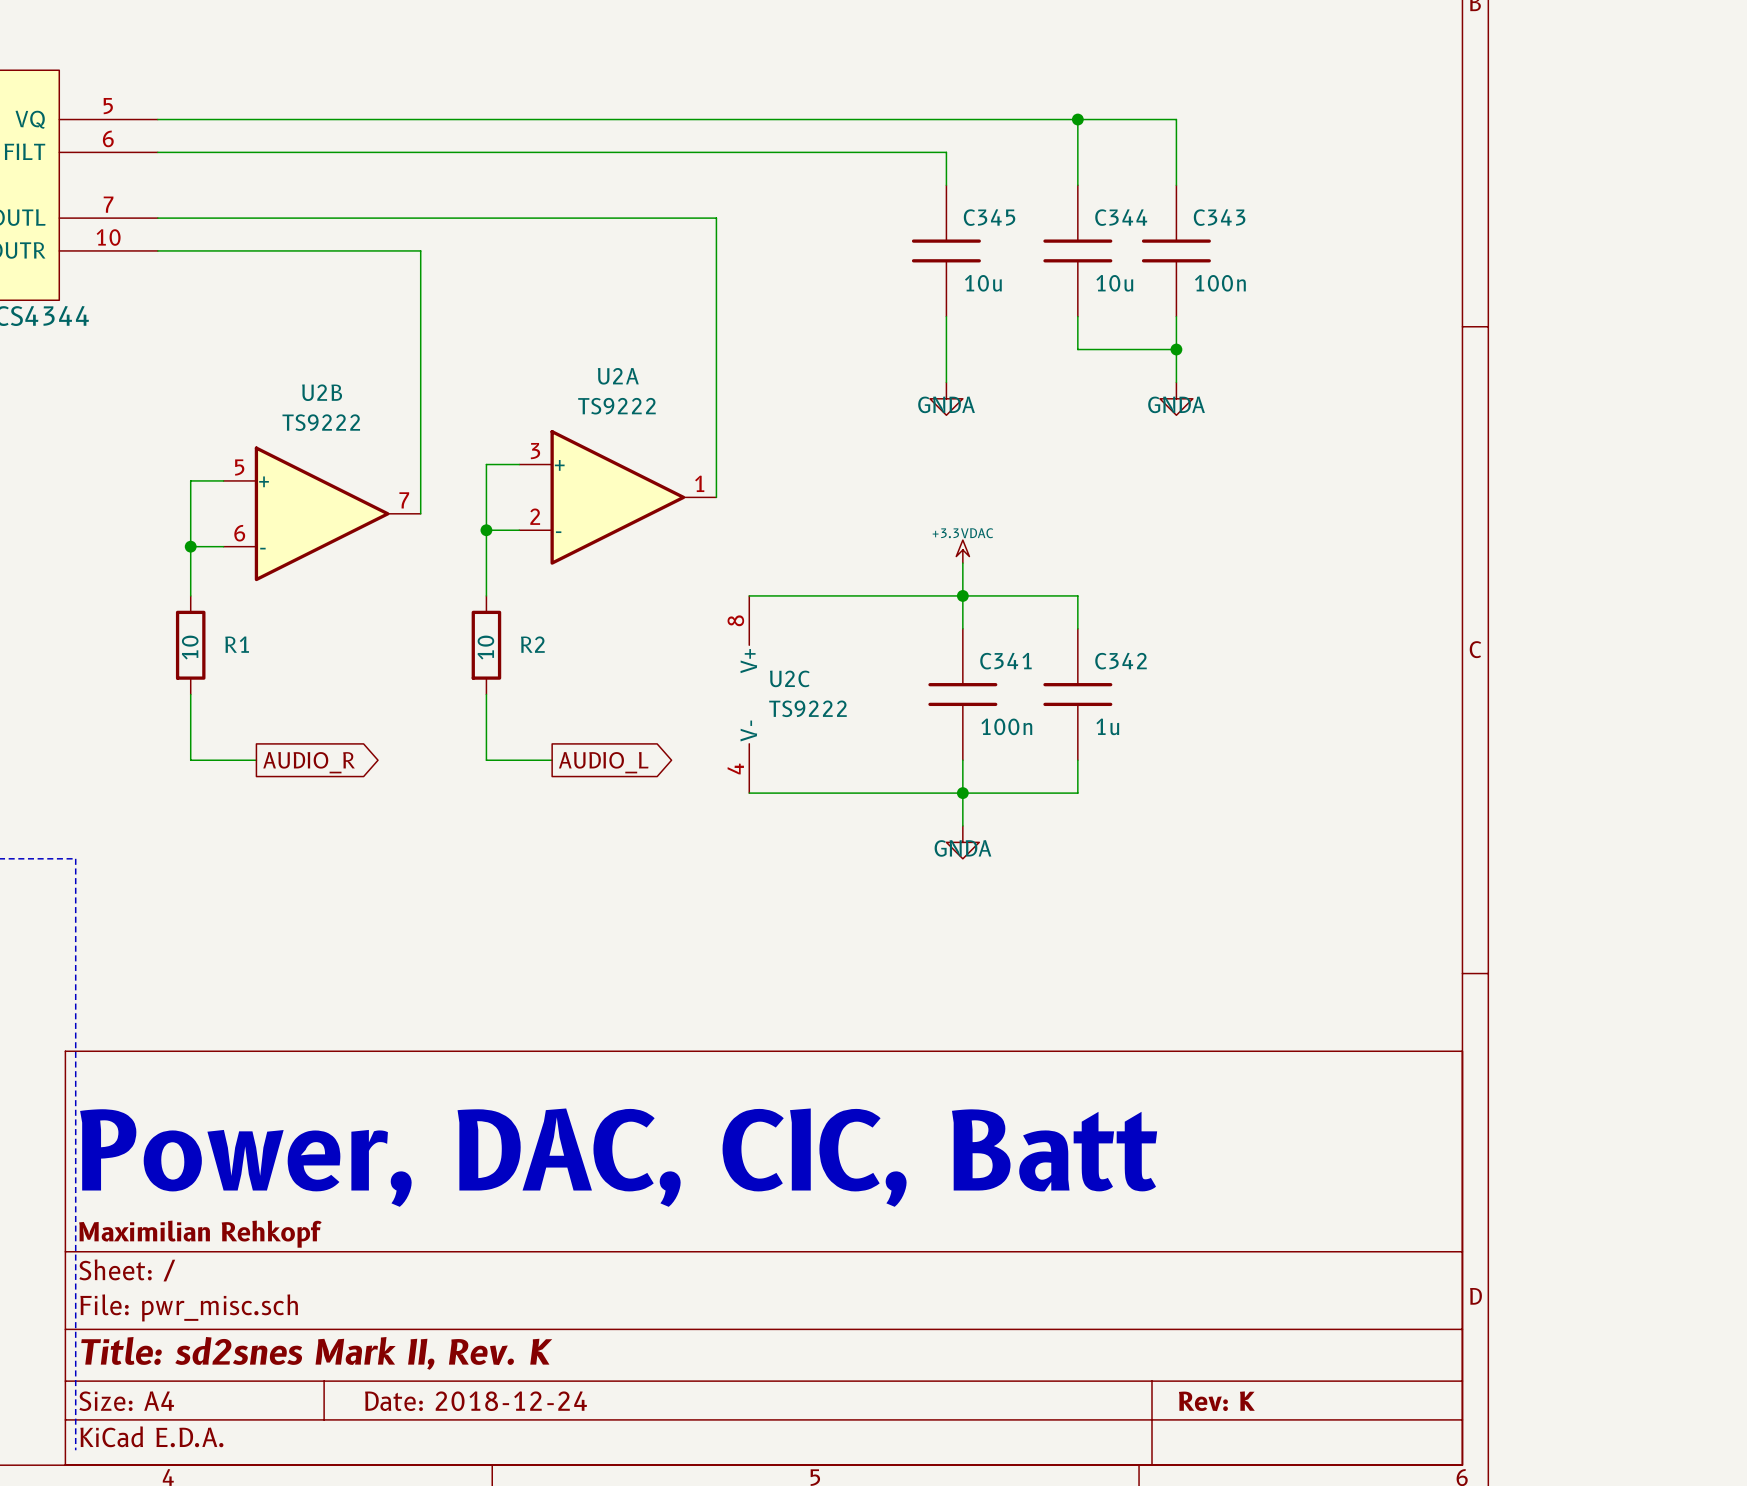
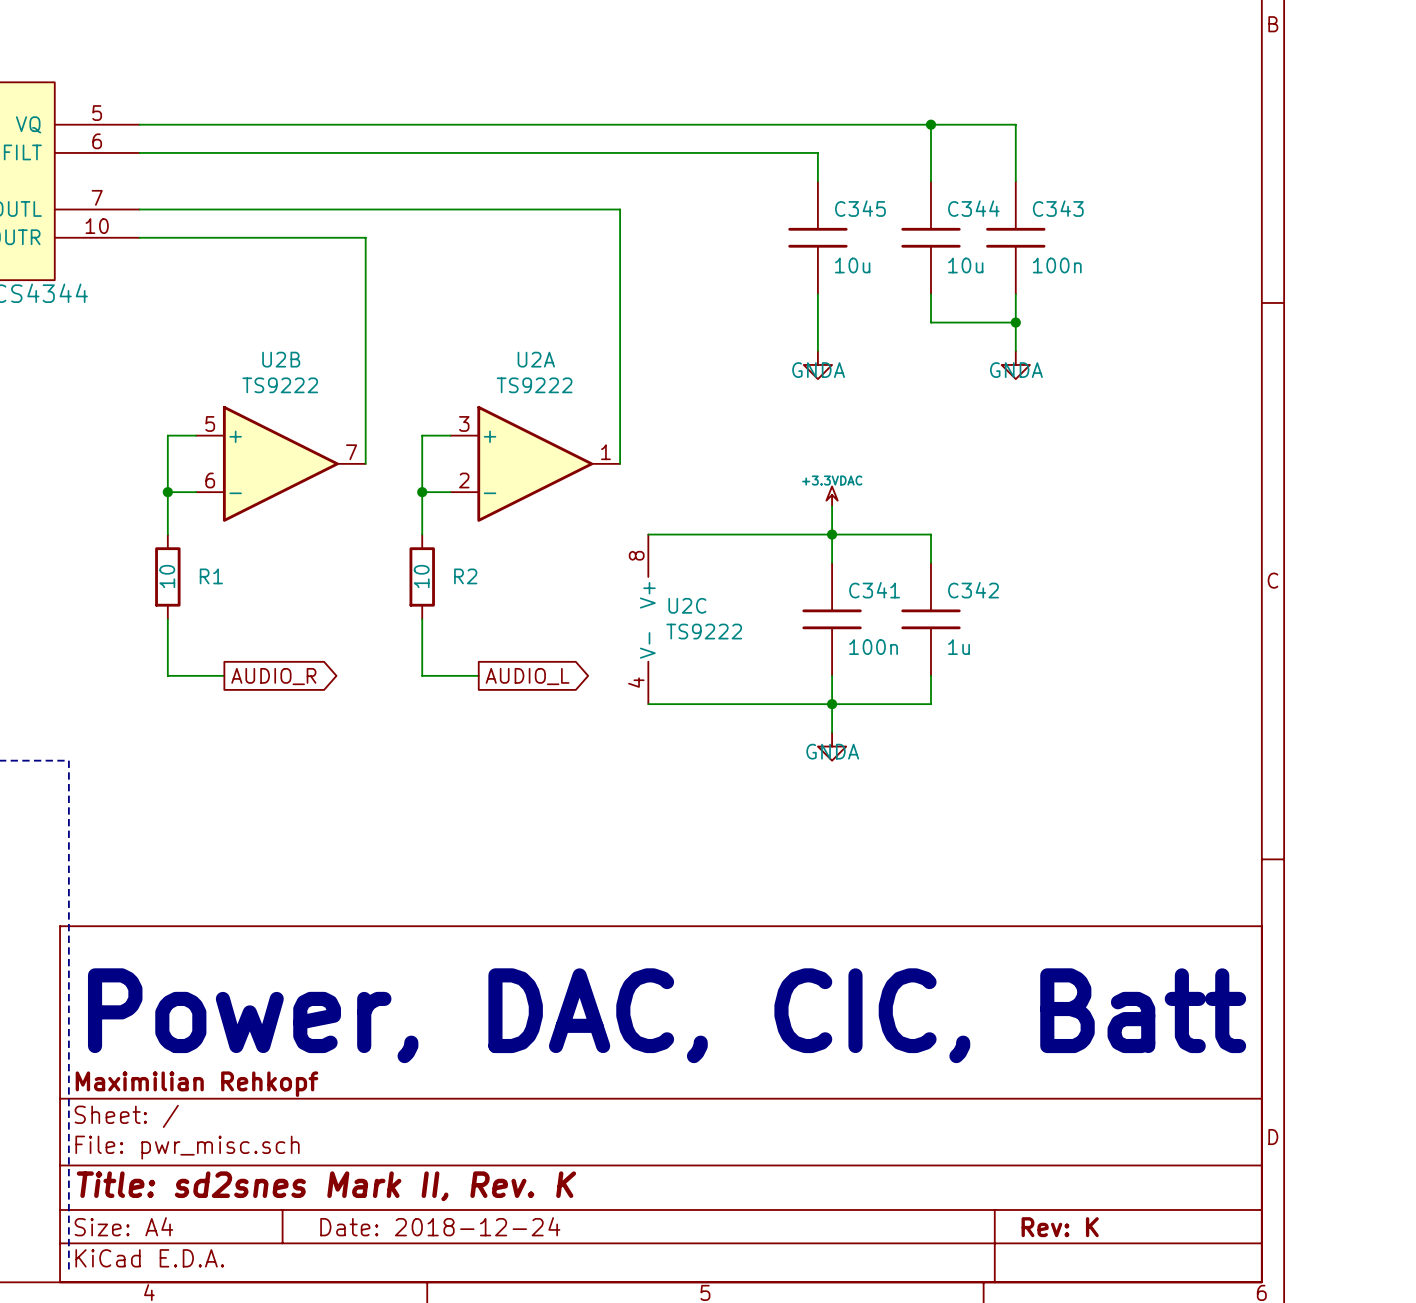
wire: (519, 464) (486, 464) (486, 480) -> (450, 435) (422, 435)
U2A position: (617, 497) -> (535, 463)
wire: none -> (620, 449) (620, 463)
wire: (486, 530) (519, 530) -> (422, 492) (450, 492)
junction position: (486, 530) -> (422, 492)

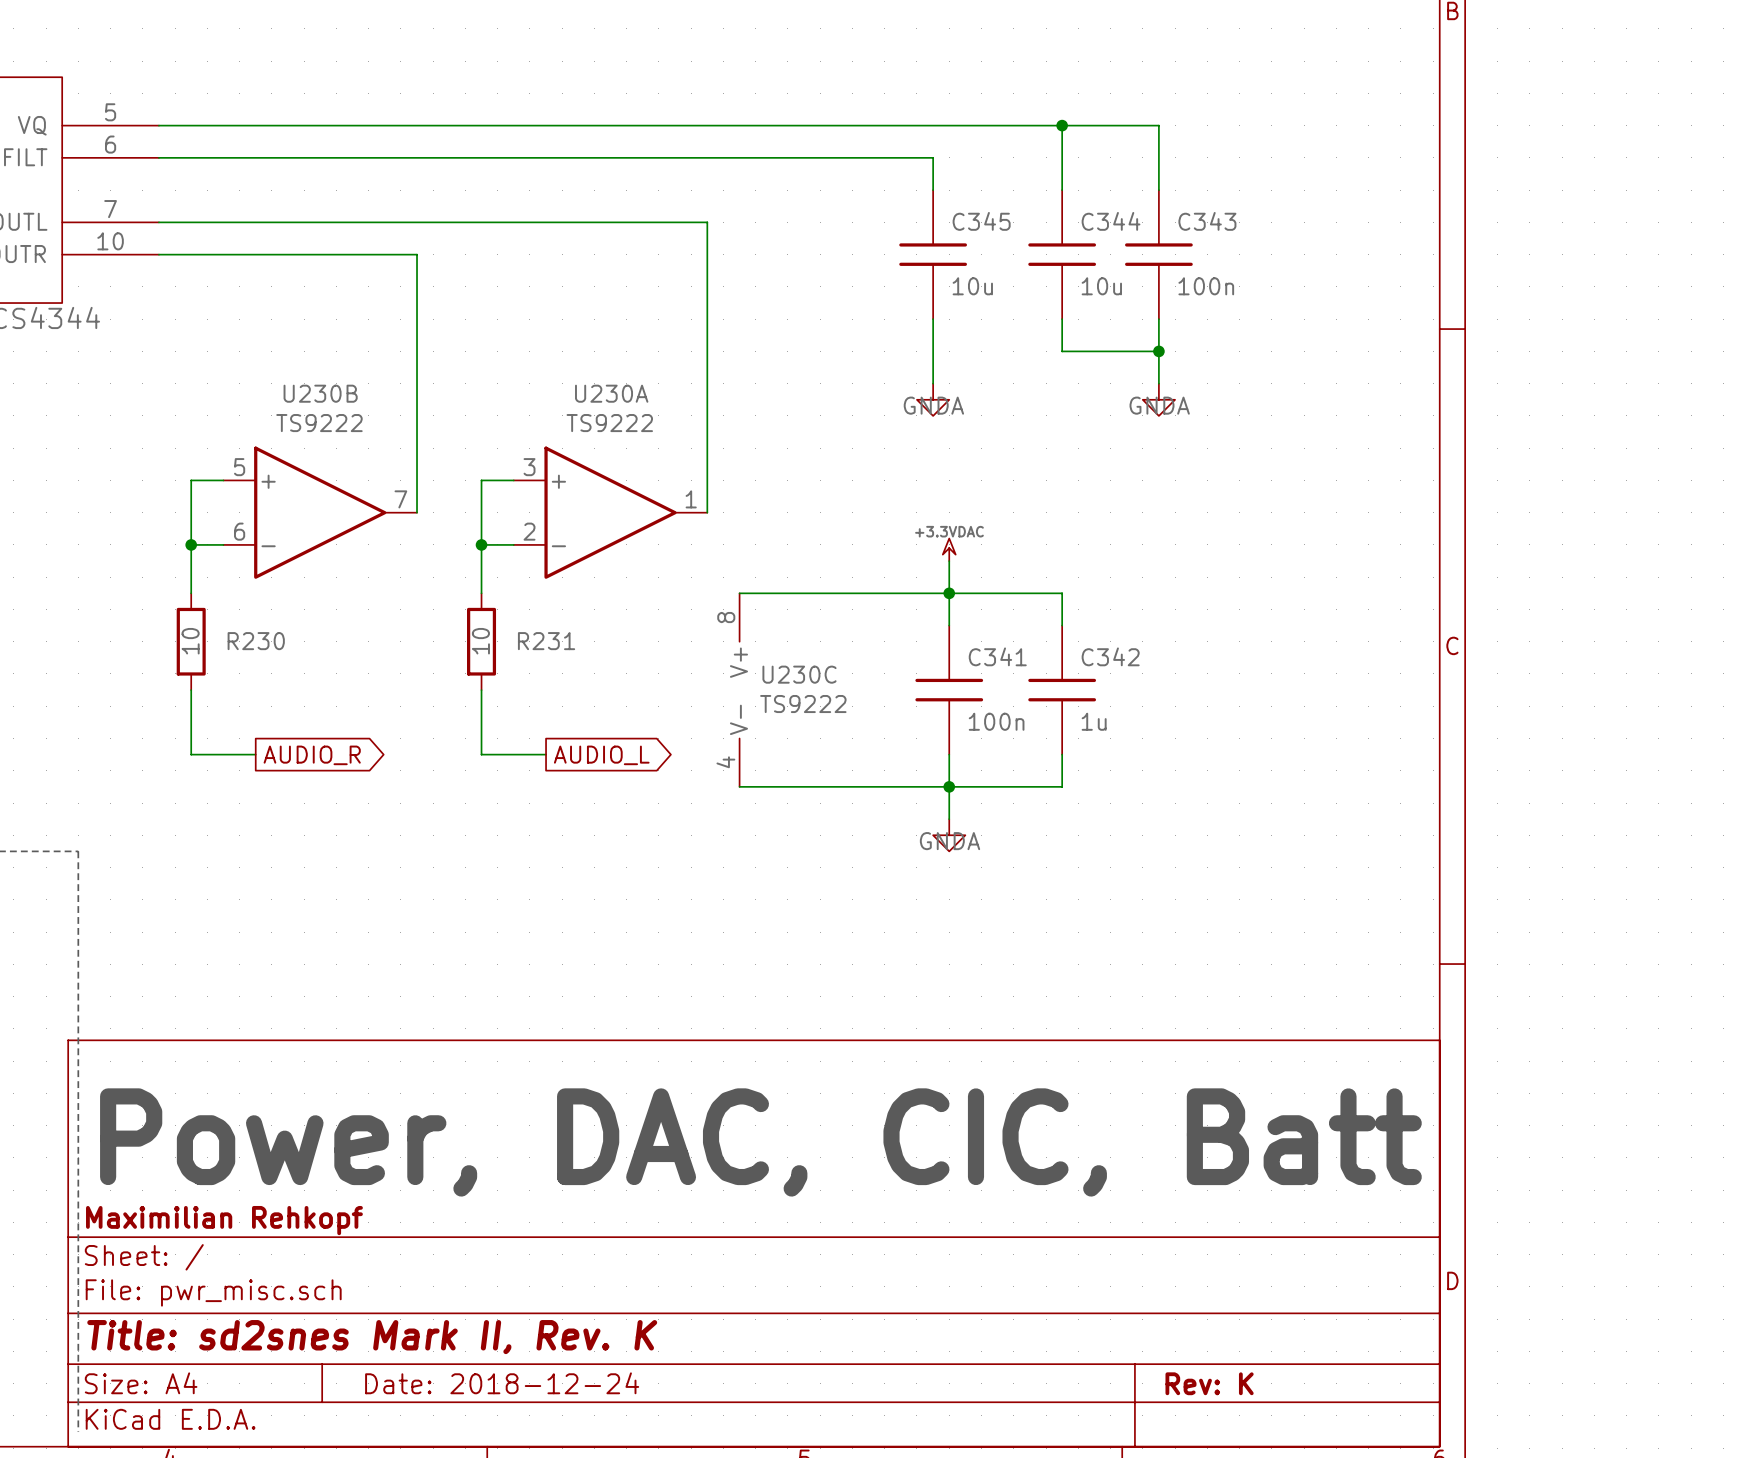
U2B name: U2B (281, 359) -> U230B (320, 393)
U2A name: U2A (536, 359) -> U230A (611, 393)
R1 name: R1 (211, 576) -> R230 (256, 641)
R2 name: R2 (465, 576) -> R231 (546, 641)
U2C name: U2C (687, 605) -> U230C (799, 674)

